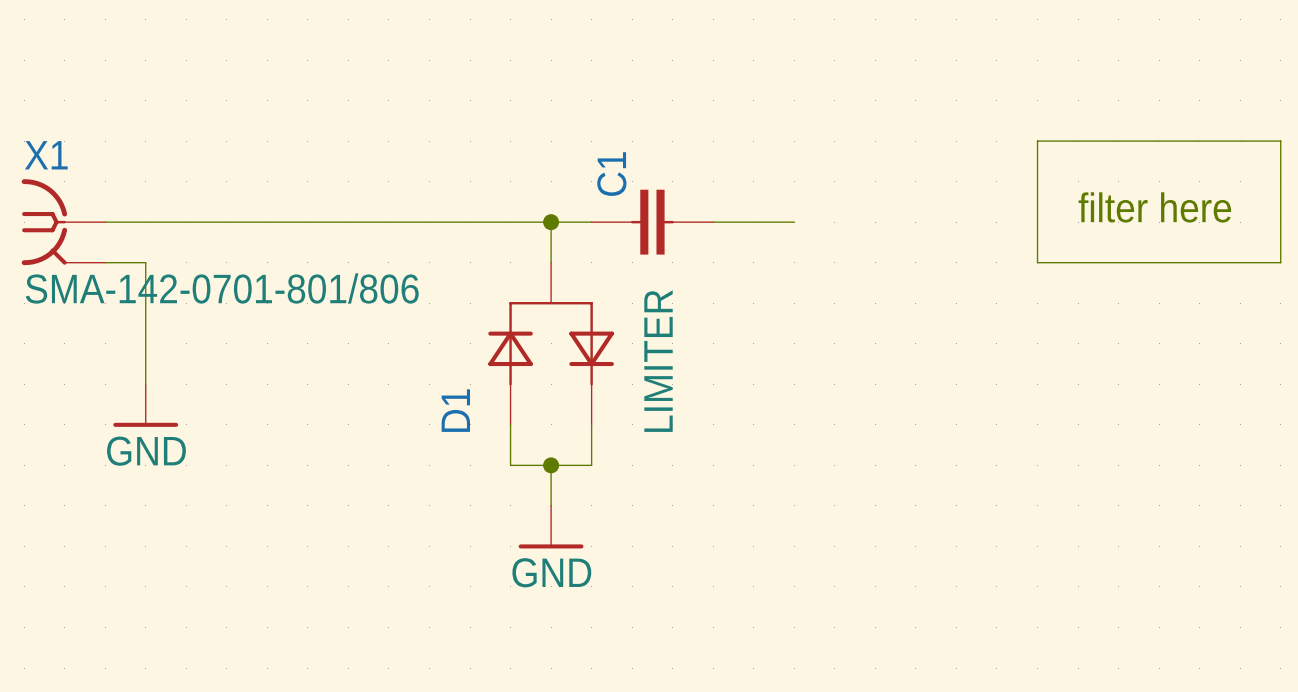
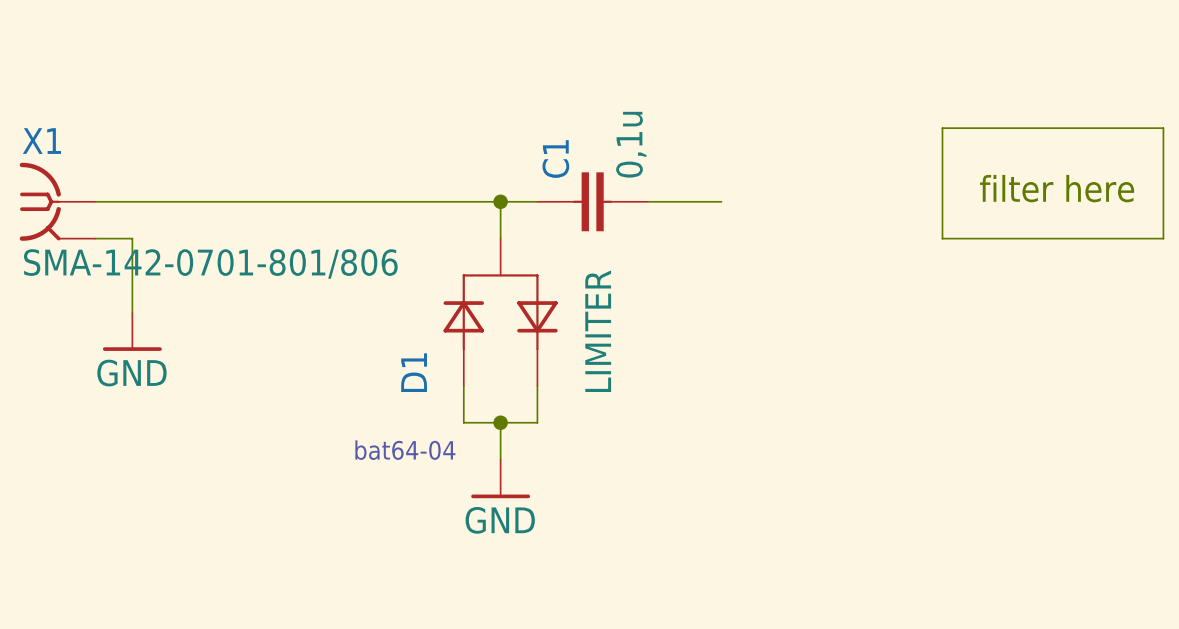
C1 value: none -> 0,1u (631, 144)
power symbol position: GND (145, 405) -> GND (132, 331)
text: none -> bat64-04 (405, 450)

